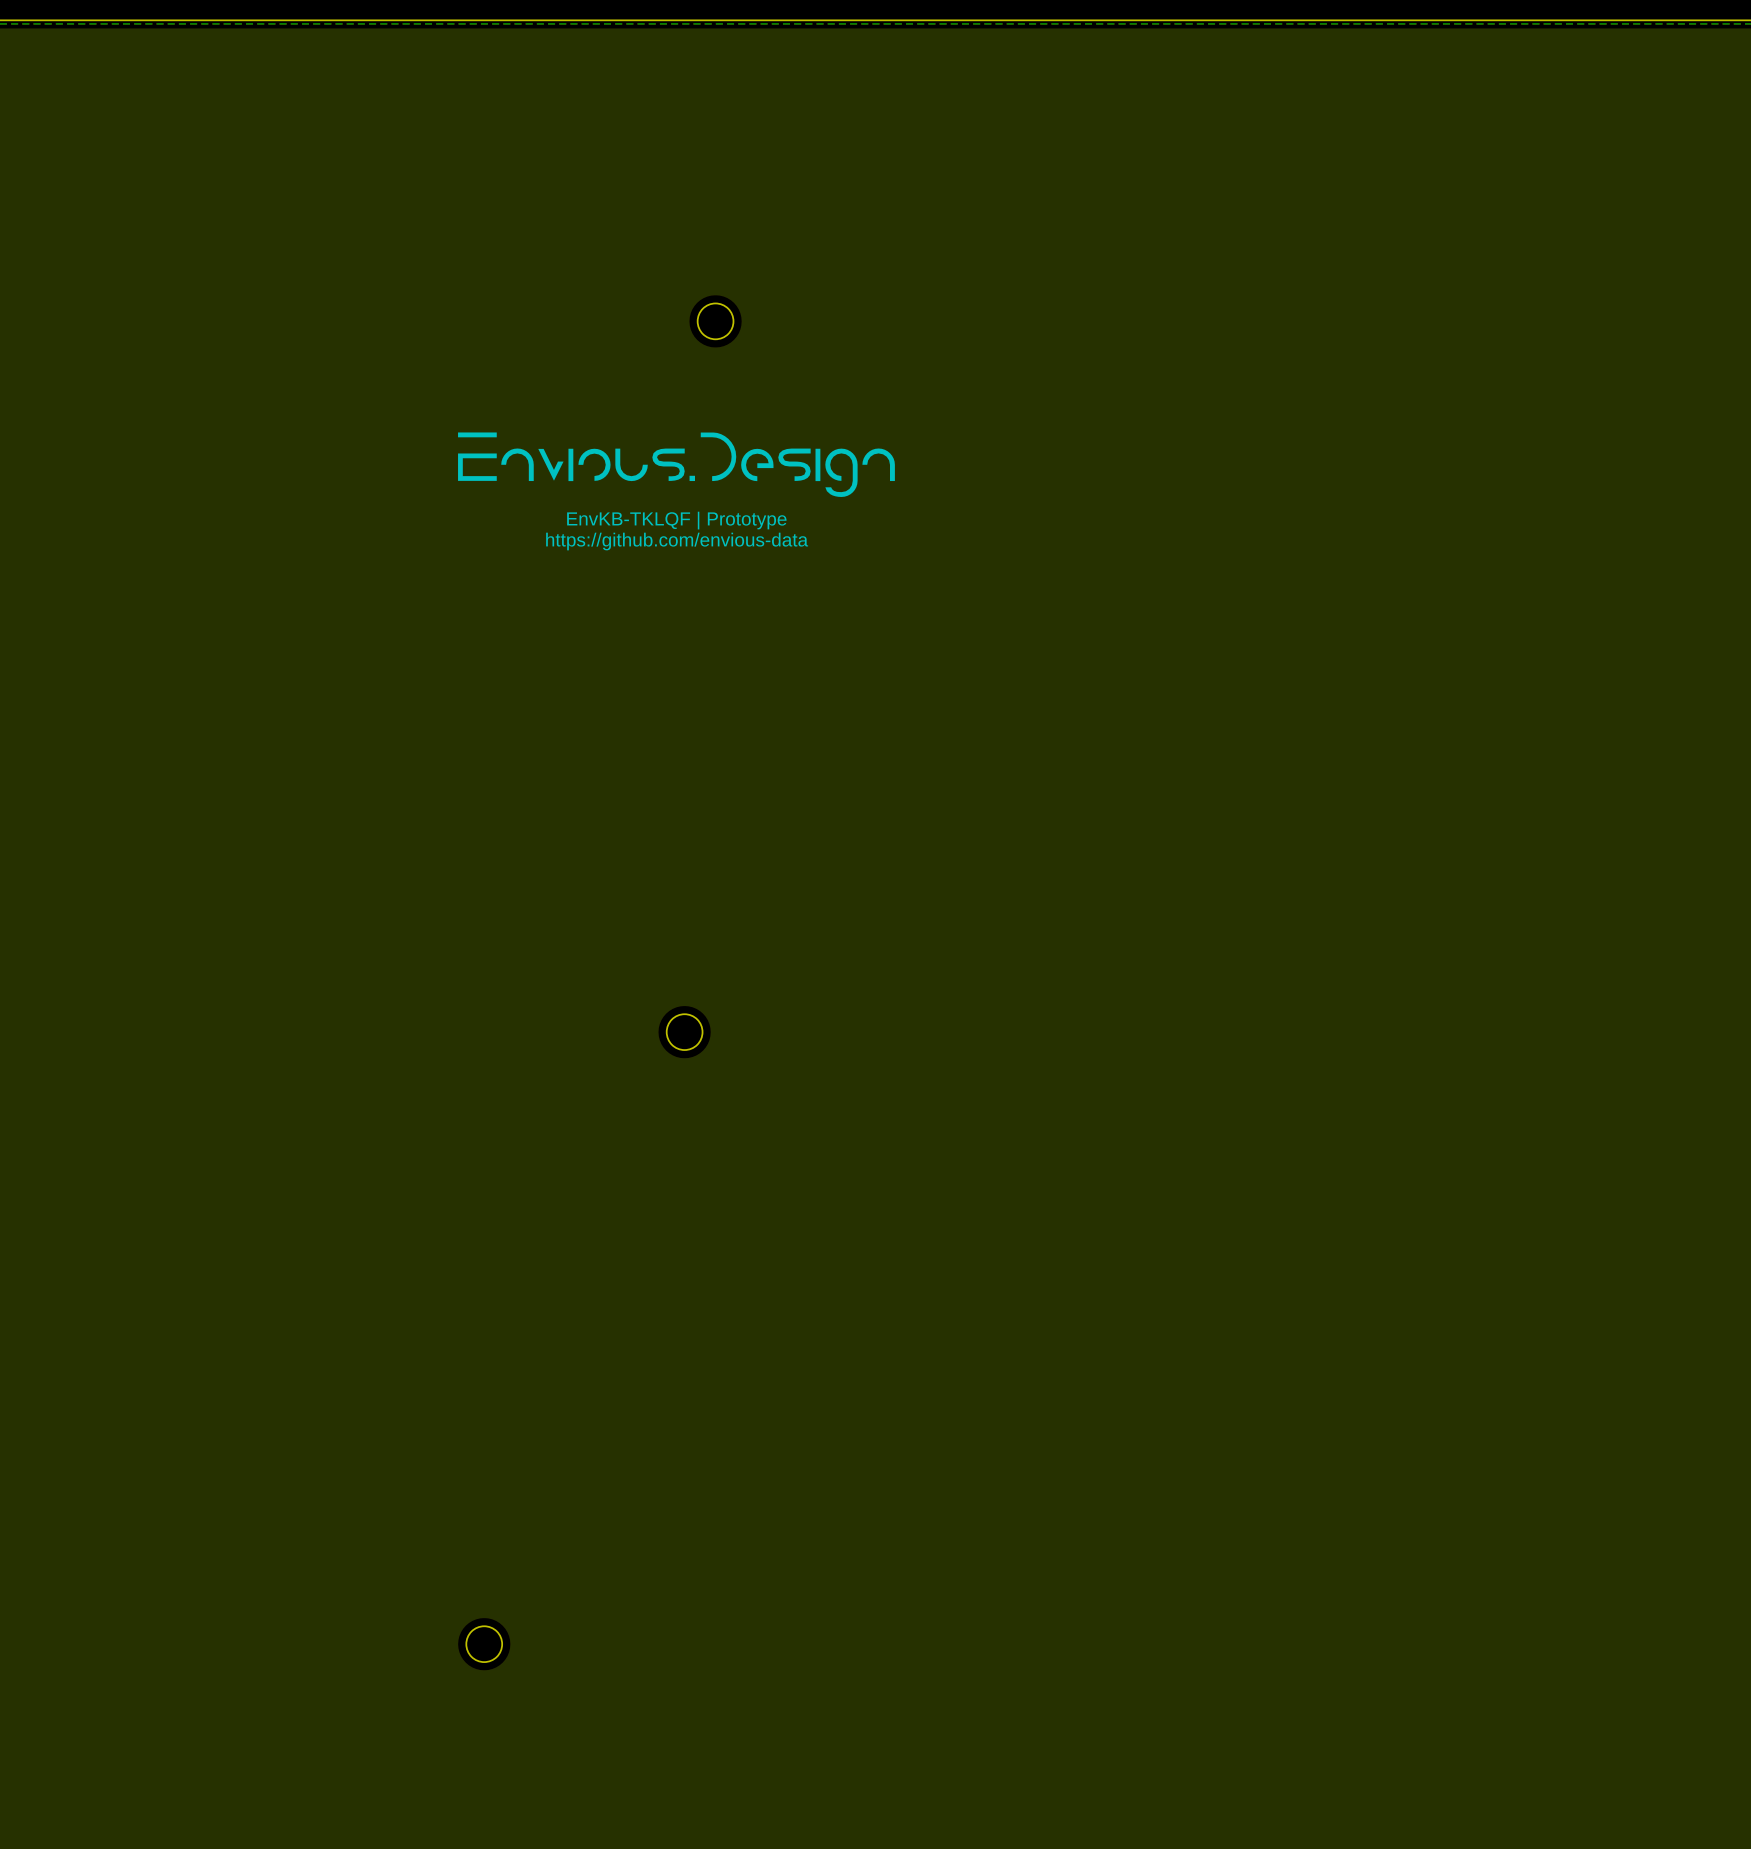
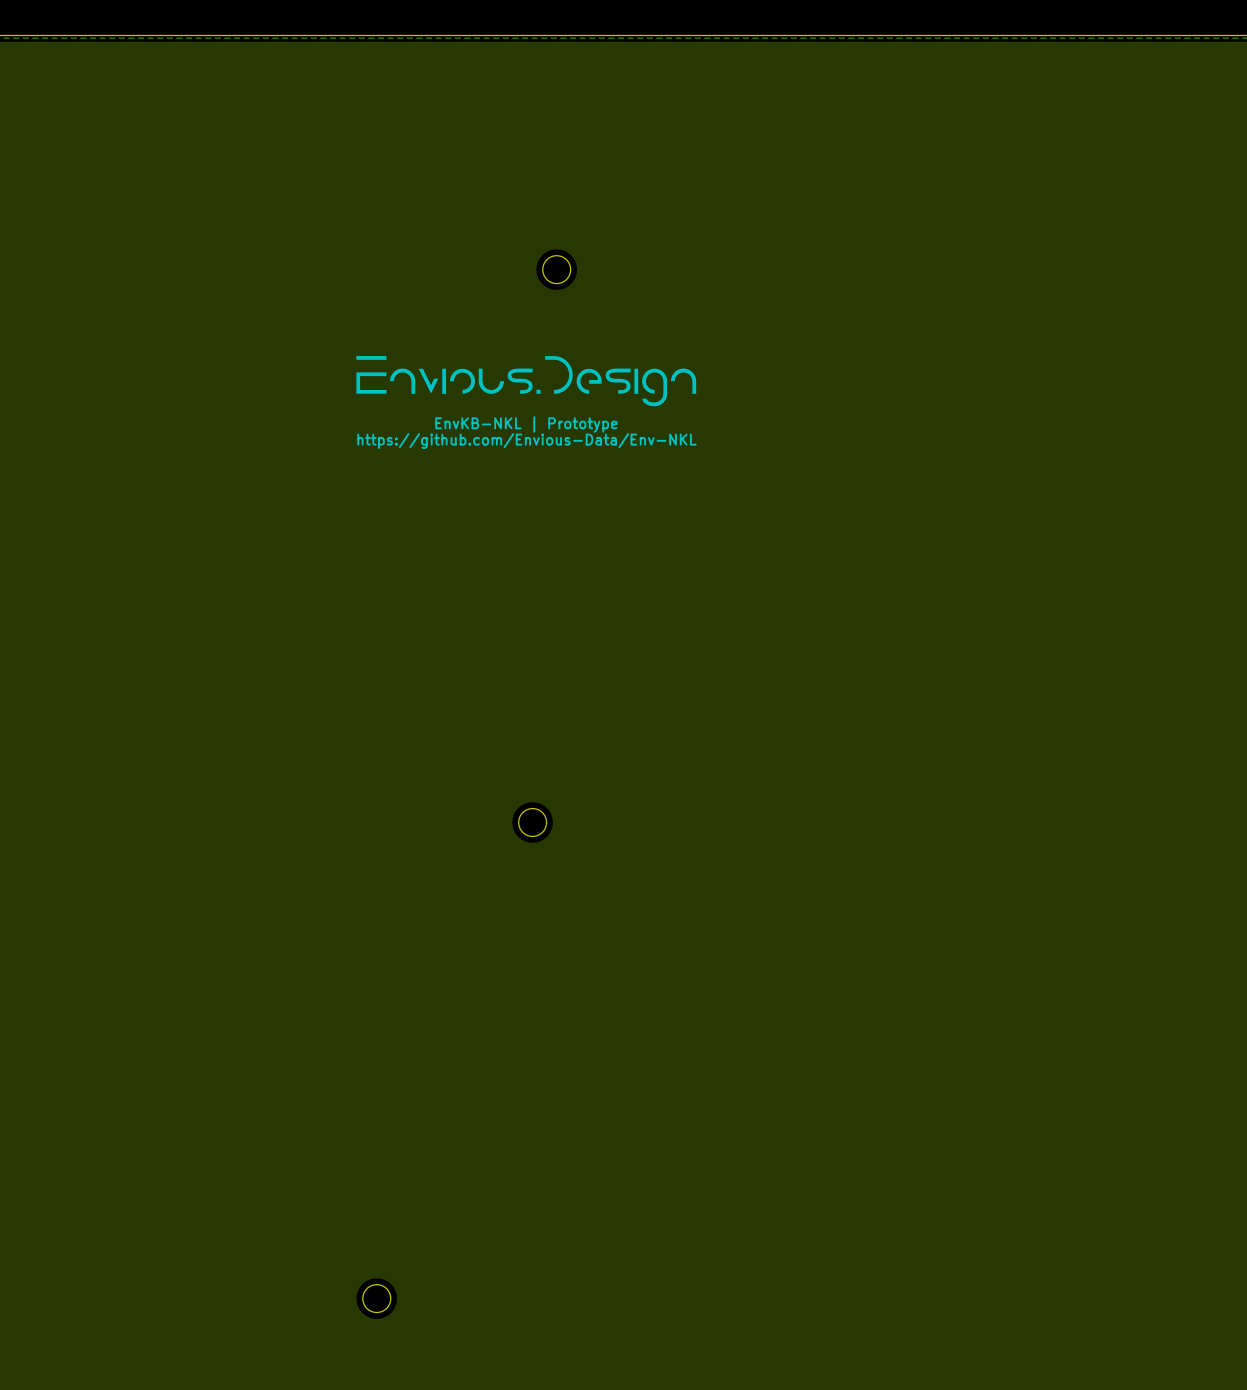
text: EnvKB-TKLQF | Prototype (676, 520) -> EnvKB-NKL | Prototype (526, 424)
text: https://github.com/envious-data (677, 541) -> https://github.com/Envious-Data/Env-NKL (527, 441)

